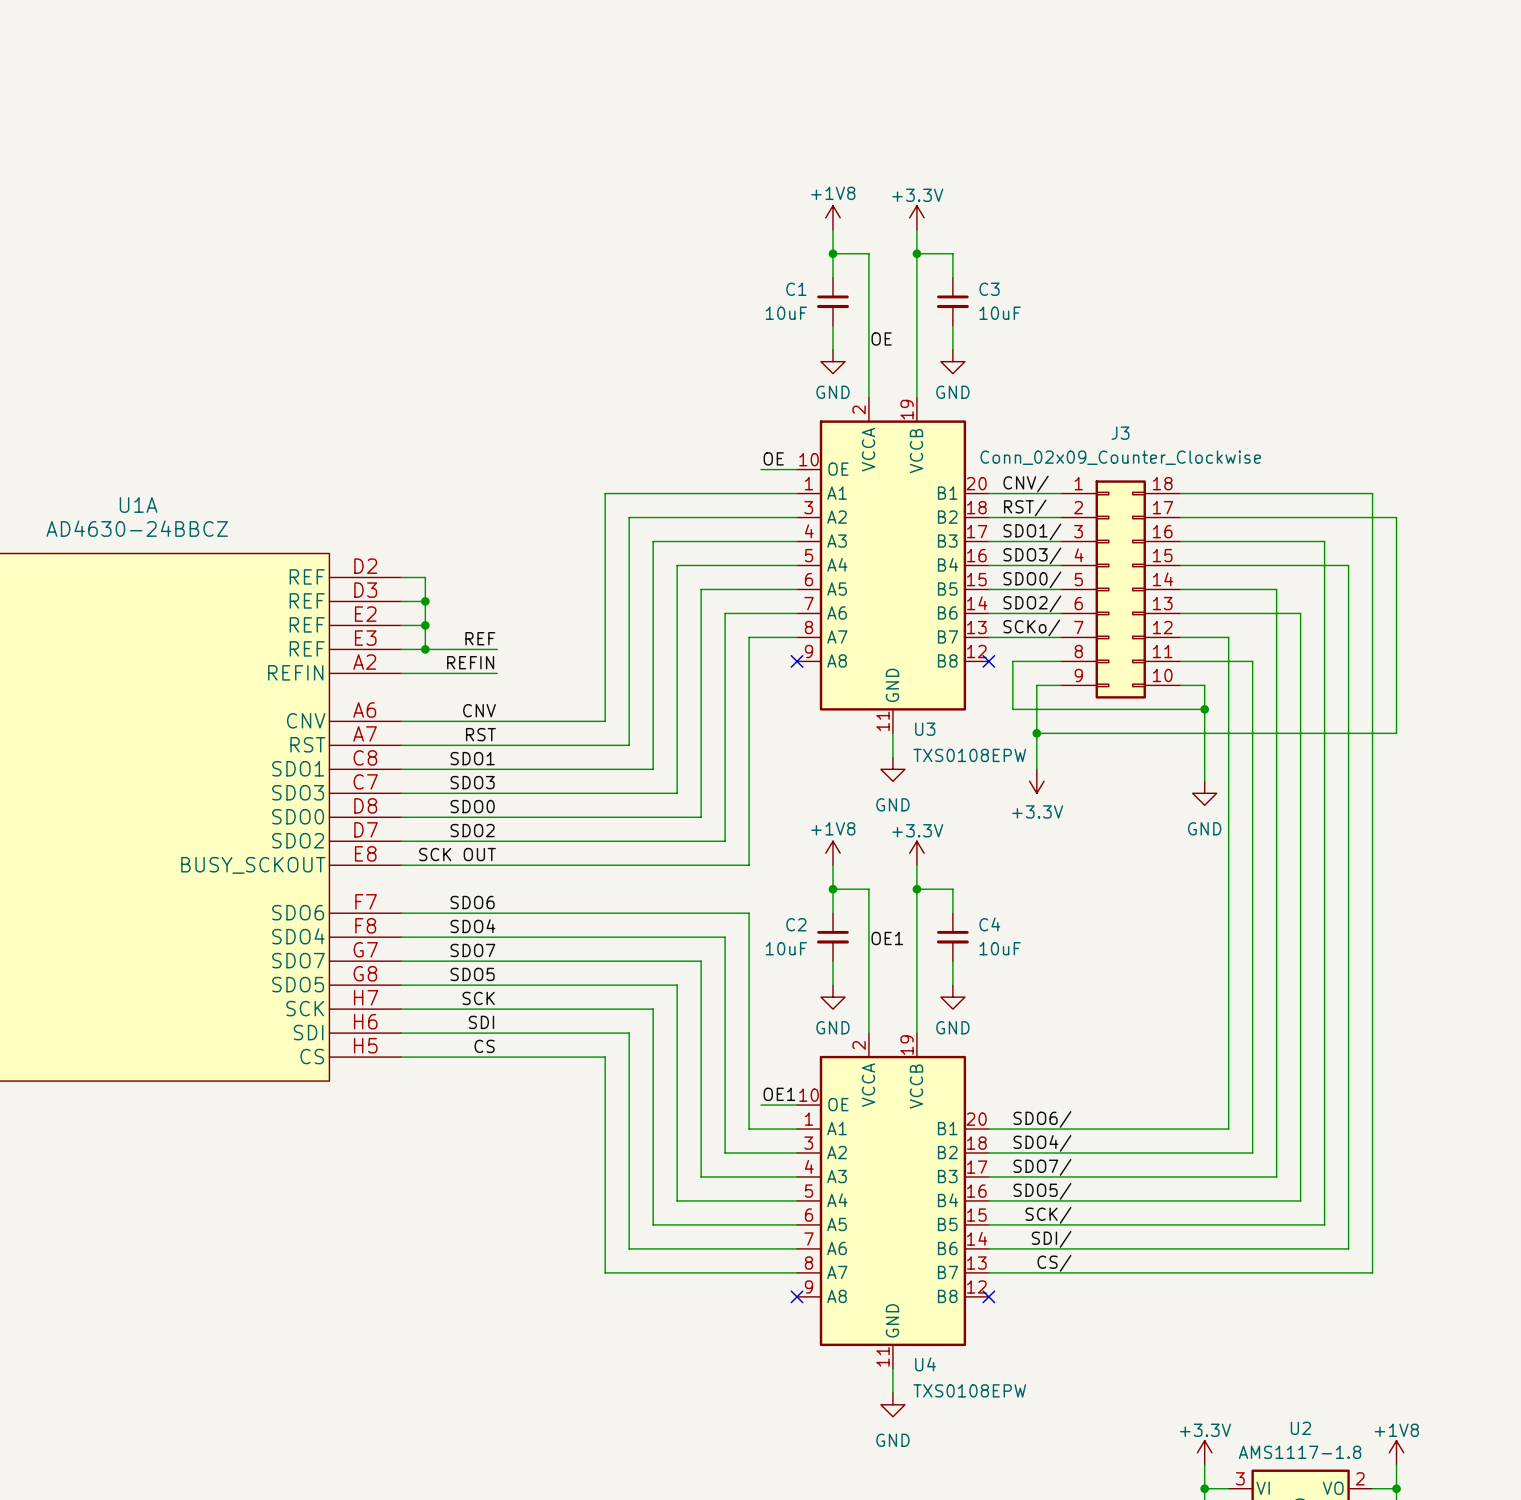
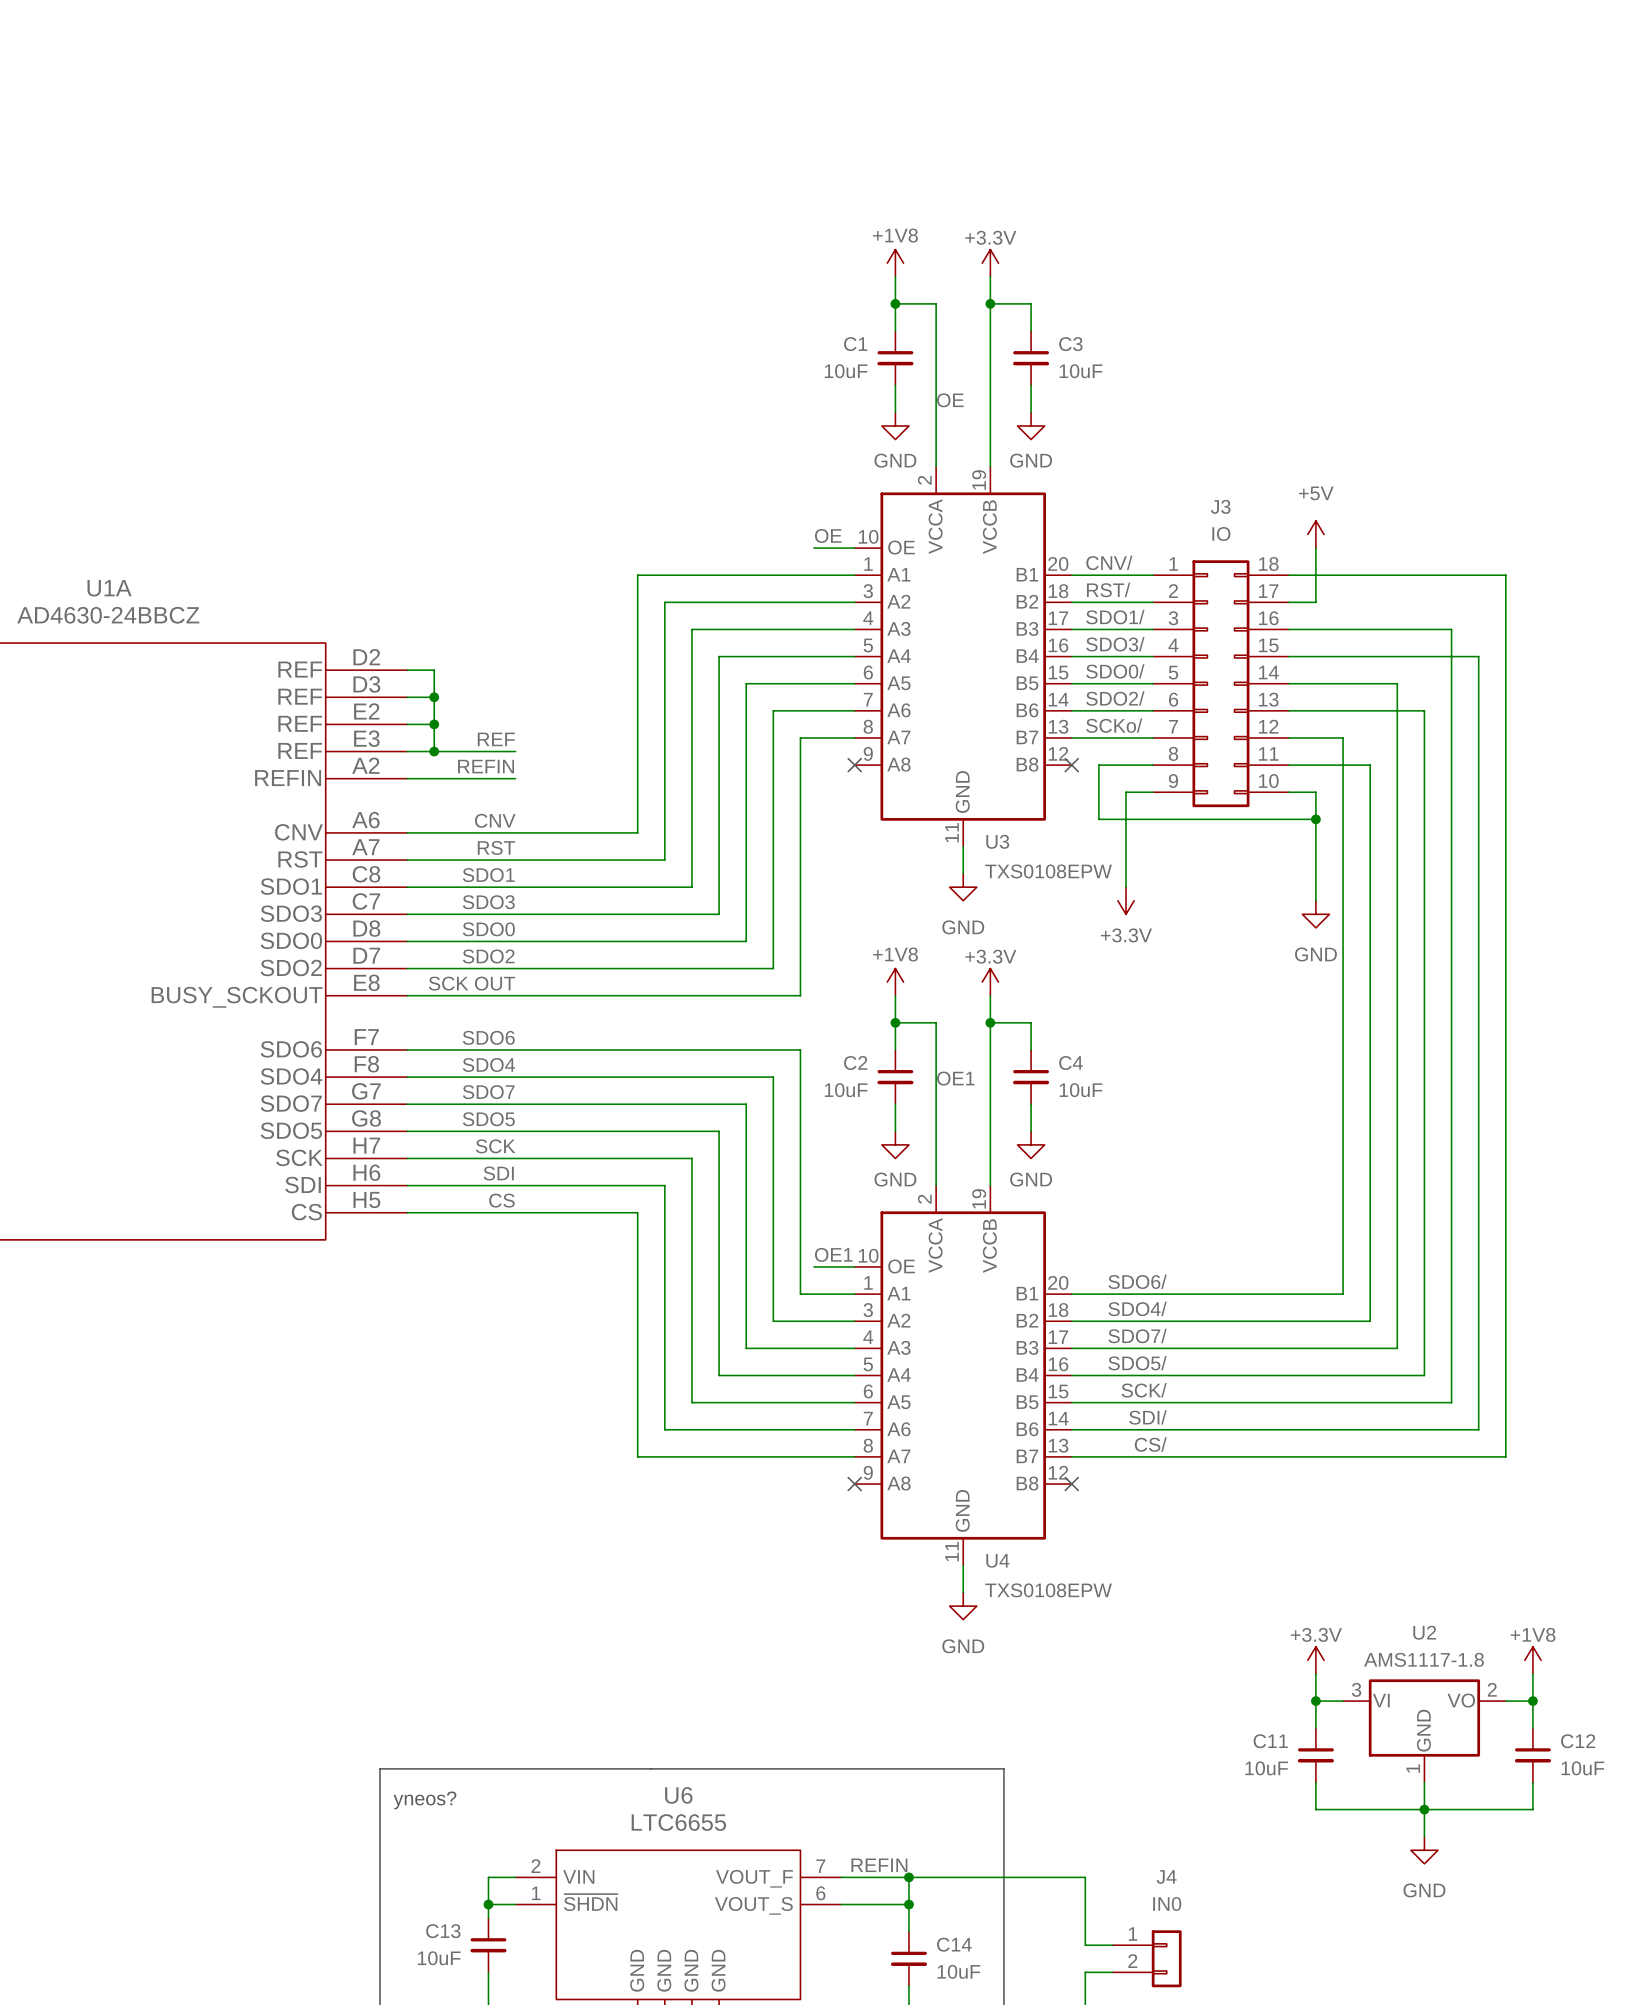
J3 value: Conn_02x09_Counter_Clockwise (1120, 457) -> IO (1221, 534)
power symbol: none -> +5V (1315, 534)
wire: (1204, 517) (1396, 517) (1396, 733) (1036, 733) -> (1315, 602) (1315, 548)
junction: (1036, 733) -> none

